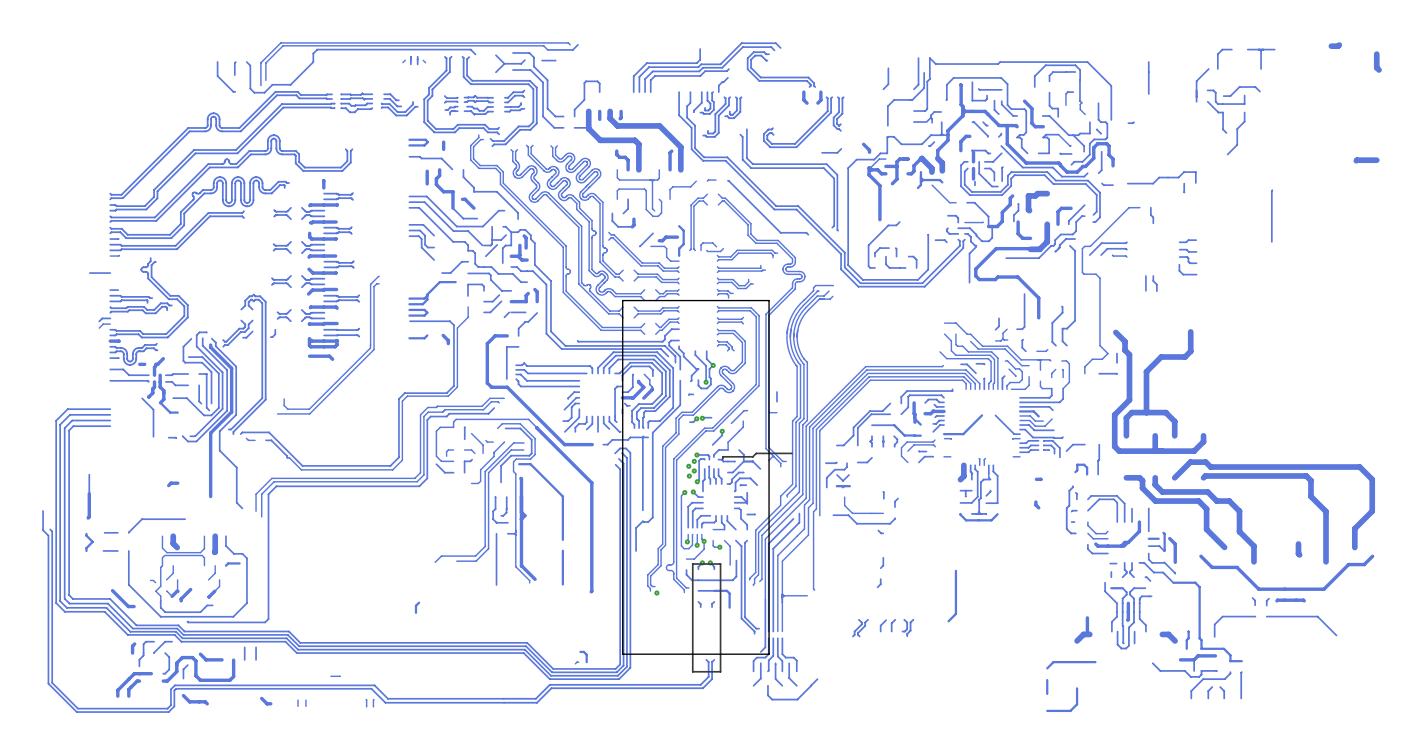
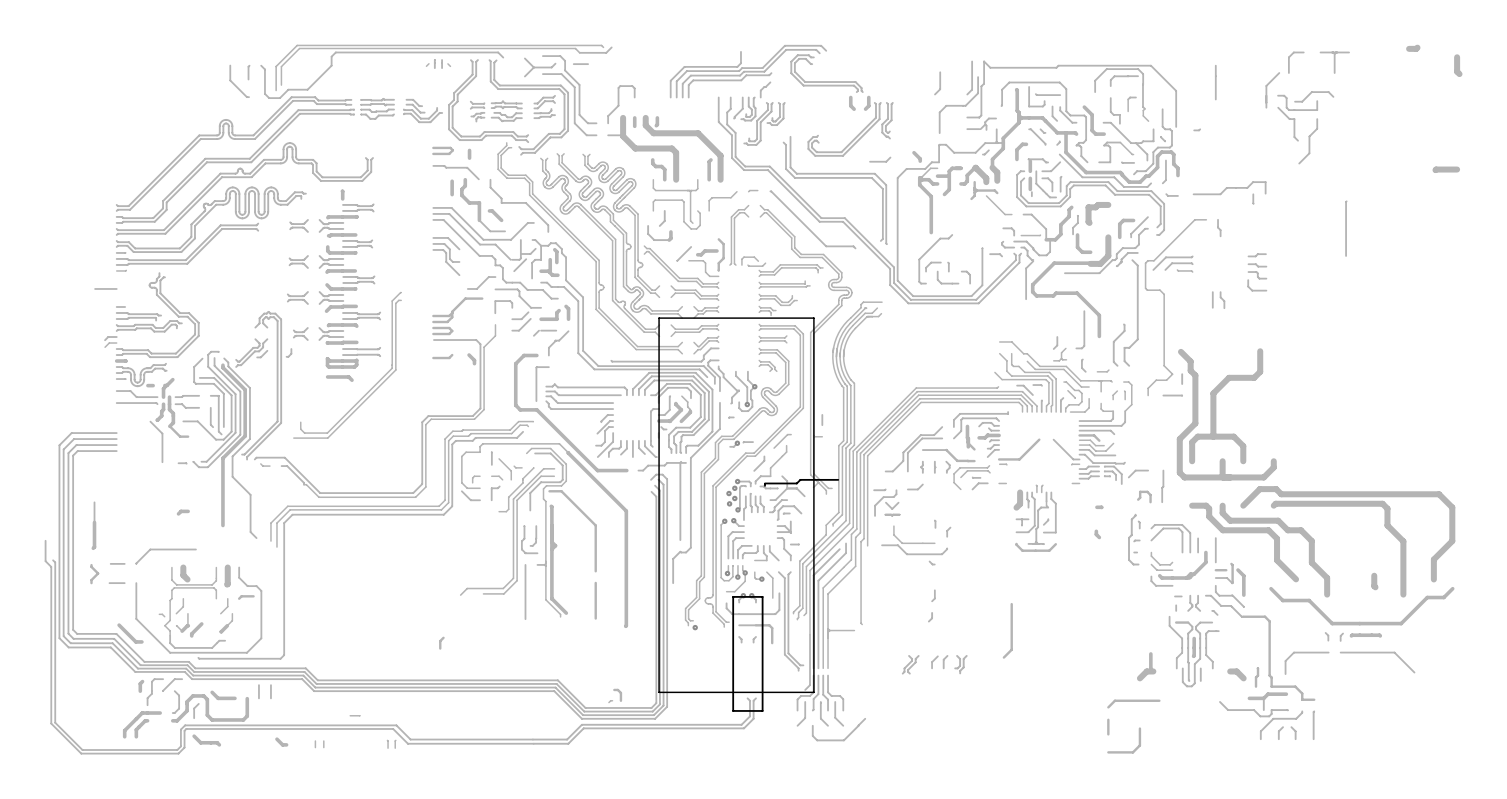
via: (702, 418) -> none
via: (722, 431) -> none

